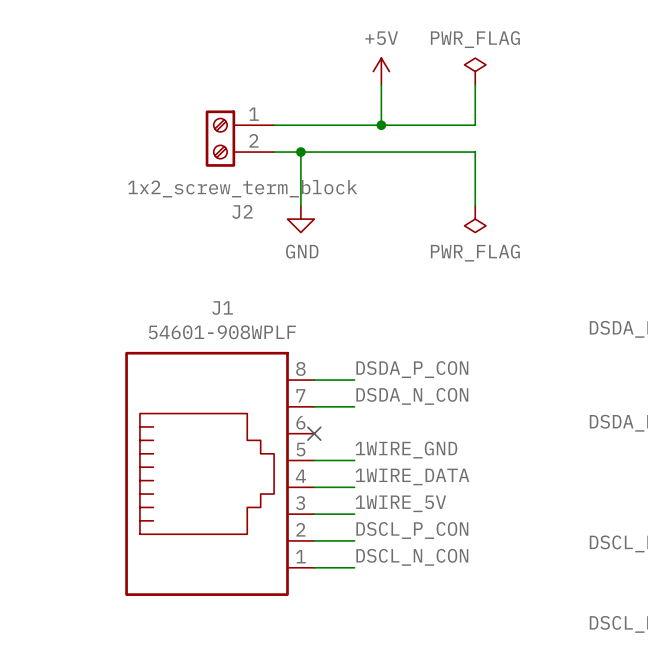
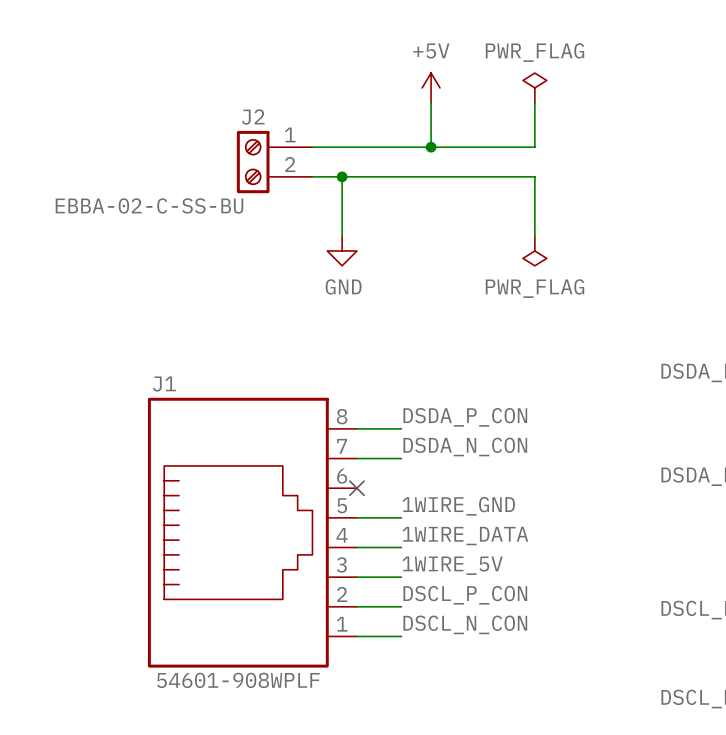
J2 value: 1x2_screw_term_block (242, 188) -> EBBA-02-C-SS-BU (149, 205)
J2 name position: J2 (242, 211) -> J2 (253, 117)
J1 name position: J1 (222, 308) -> J1 (164, 383)
J1 value position: 54601-908WPLF (222, 332) -> 54601-908WPLF (238, 680)

